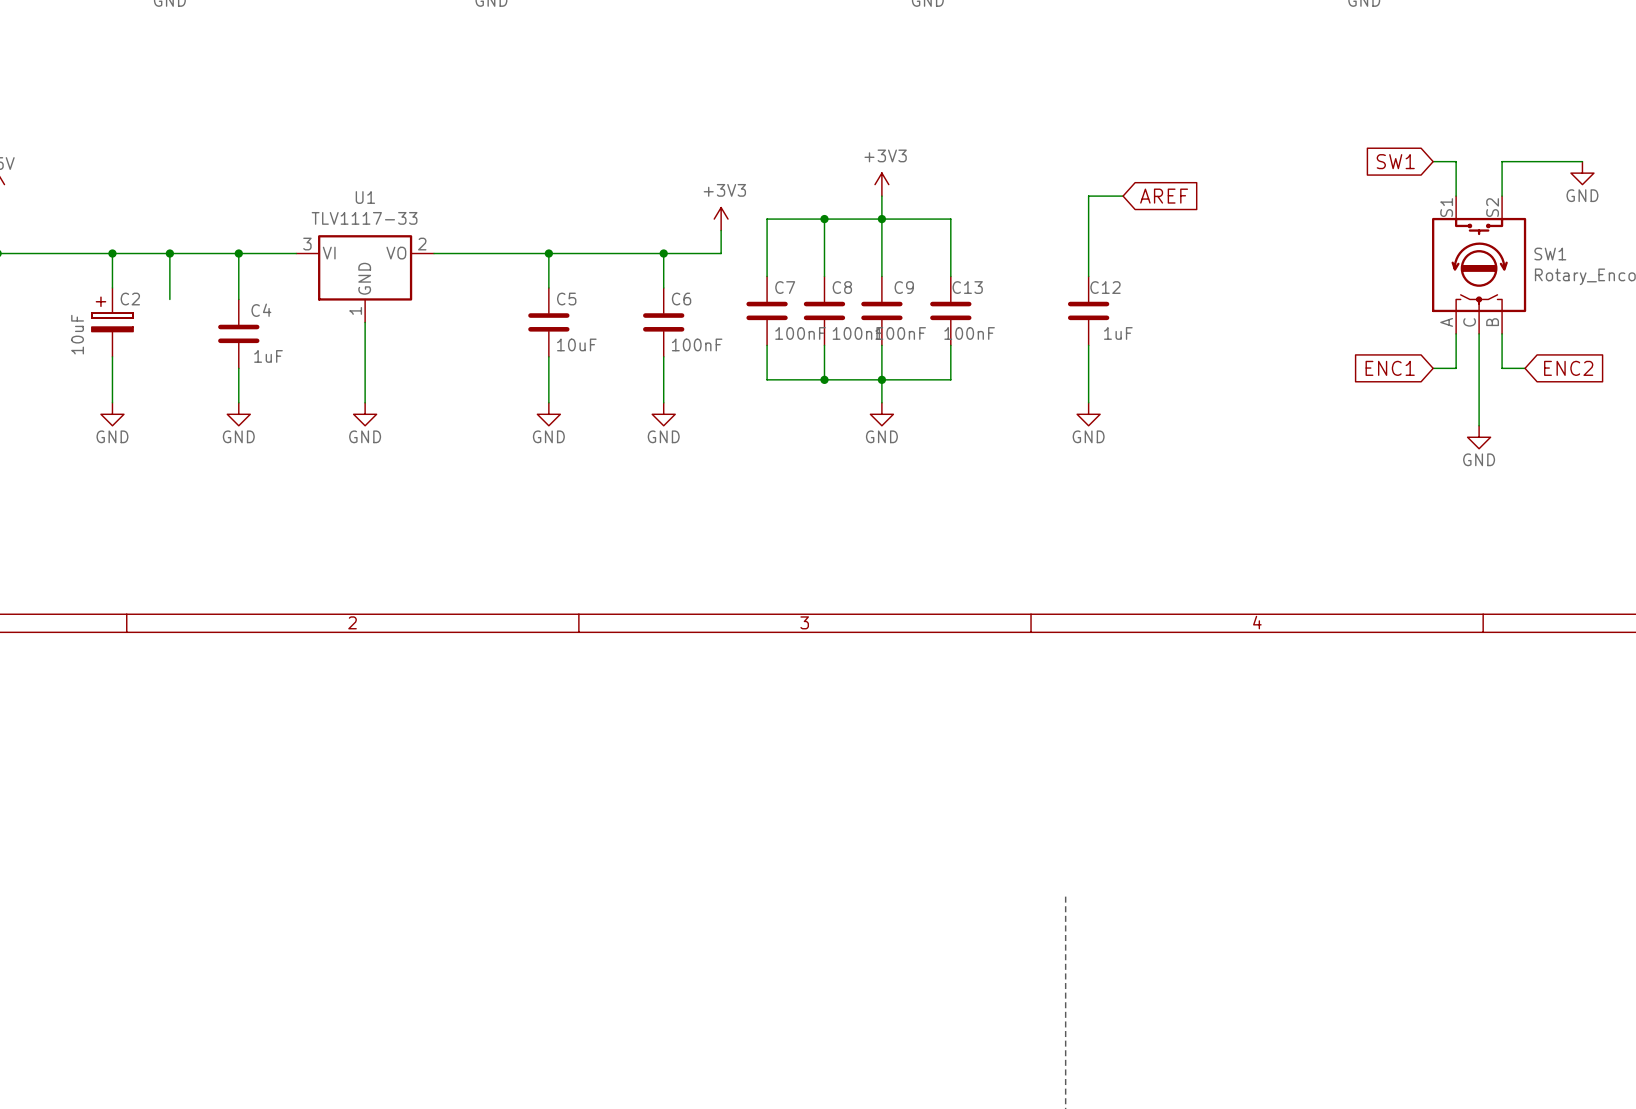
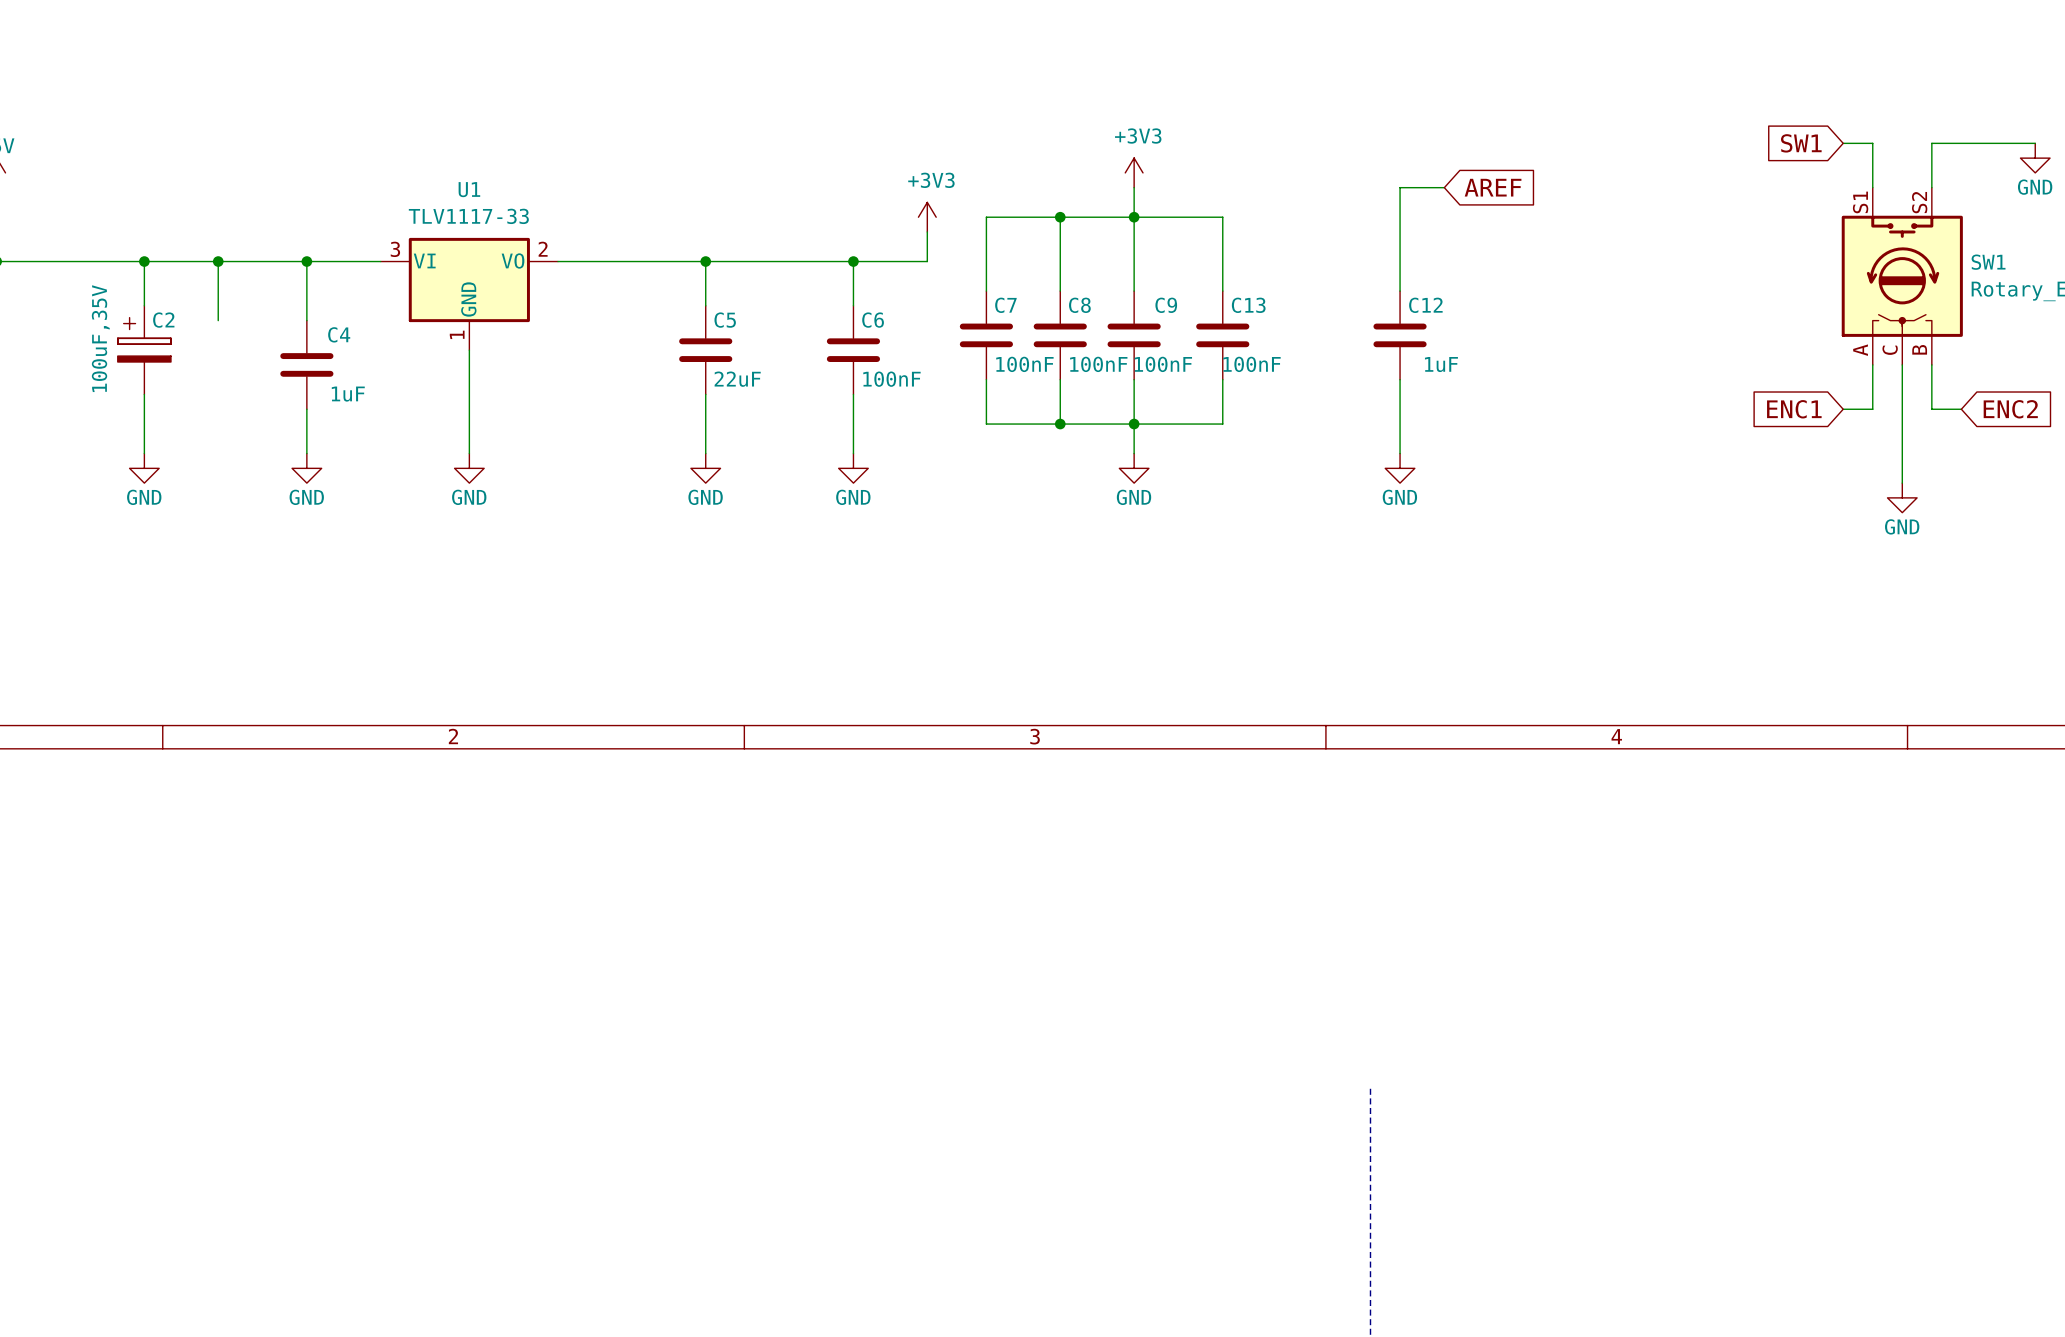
C2 value: 10uF (77, 334) -> 100uF,35V (100, 338)
C5 value: 10uF (576, 344) -> 22uF (737, 379)

